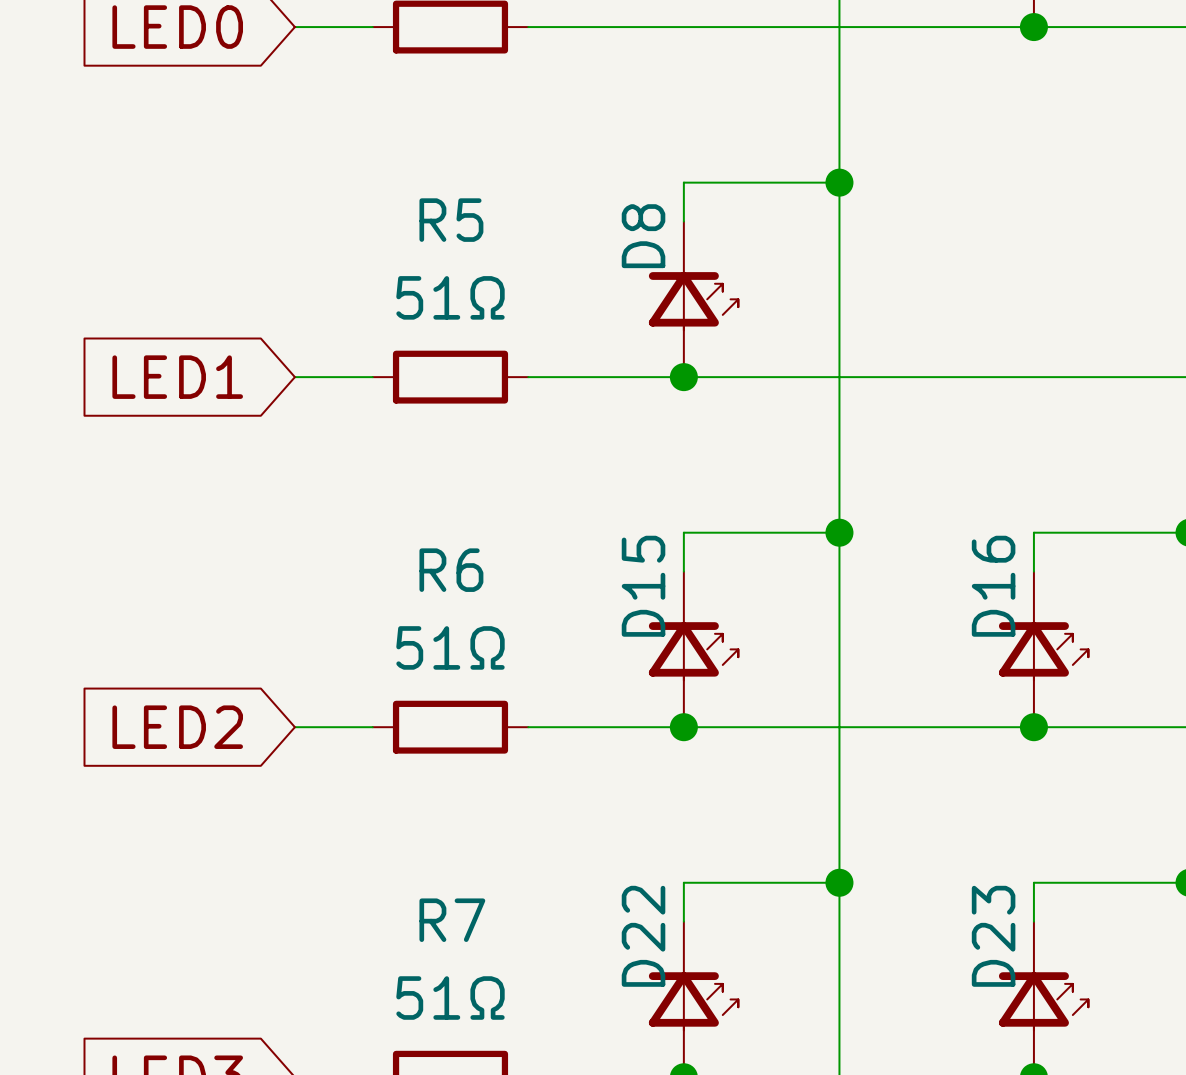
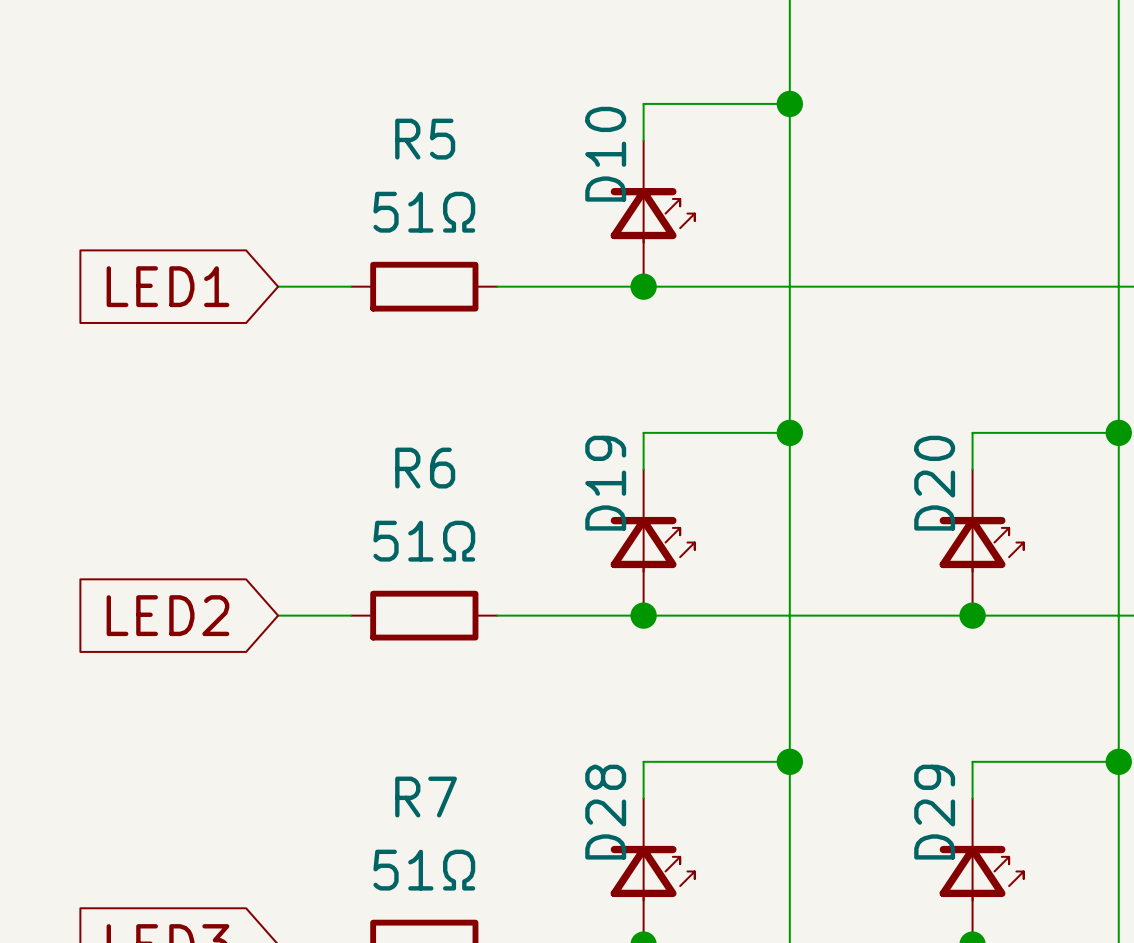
D8 name: D8 (643, 236) -> D10 (605, 154)
D15 name: D15 (643, 586) -> D19 (605, 483)
D16 name: D16 (993, 586) -> D20 (934, 483)
D22 name: D22 (643, 936) -> D28 (605, 812)
D23 name: D23 (993, 936) -> D29 (934, 812)

